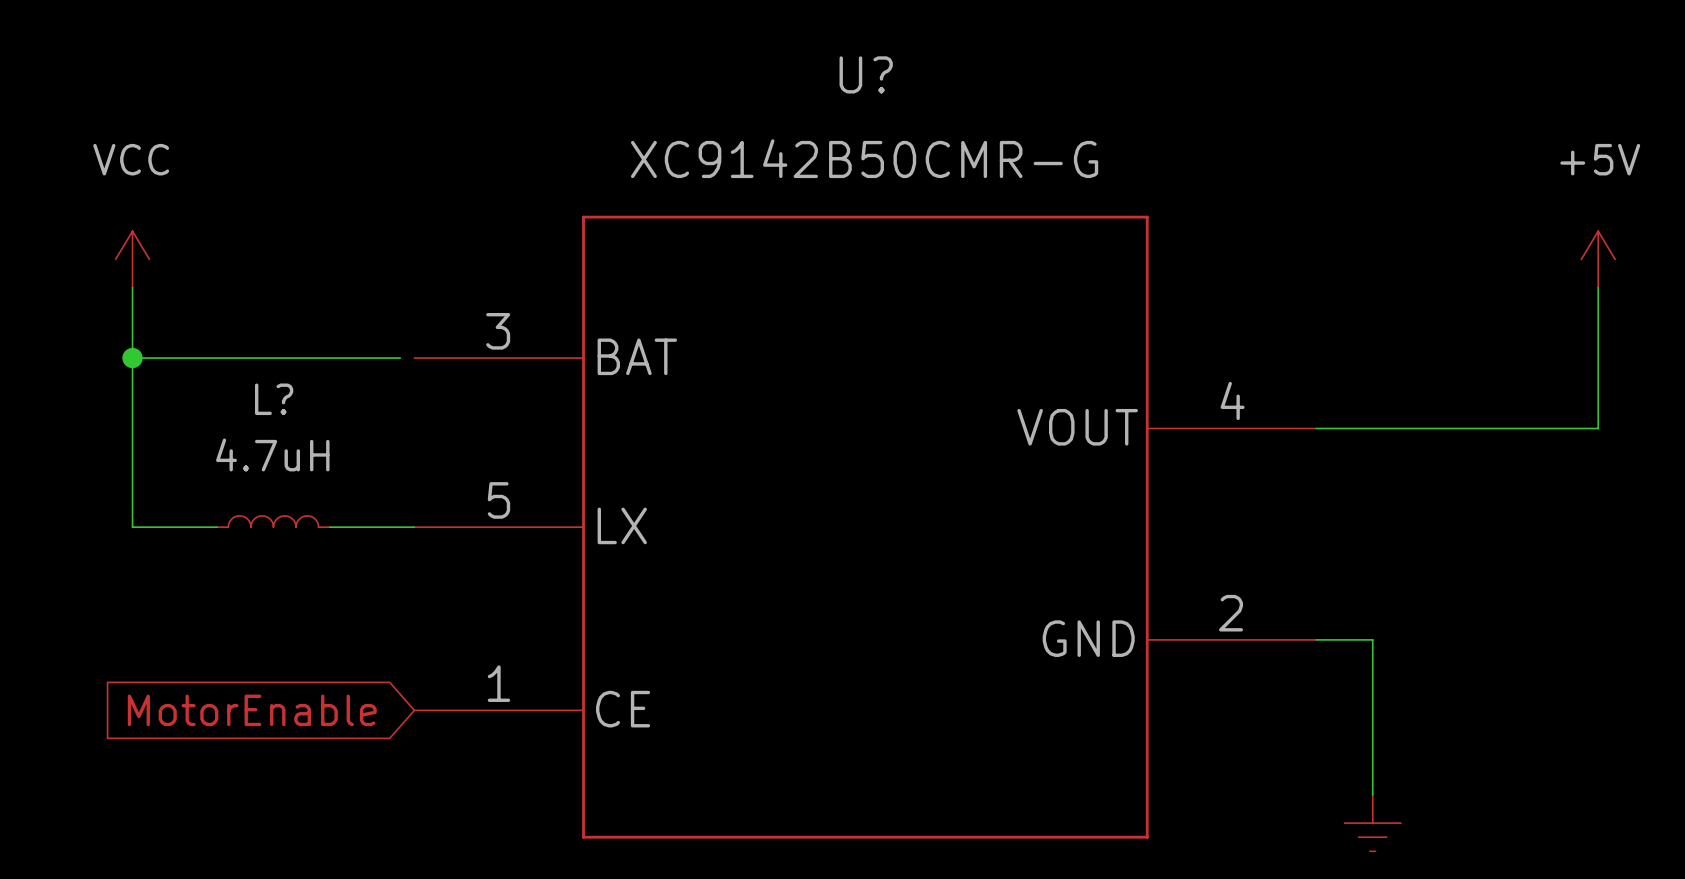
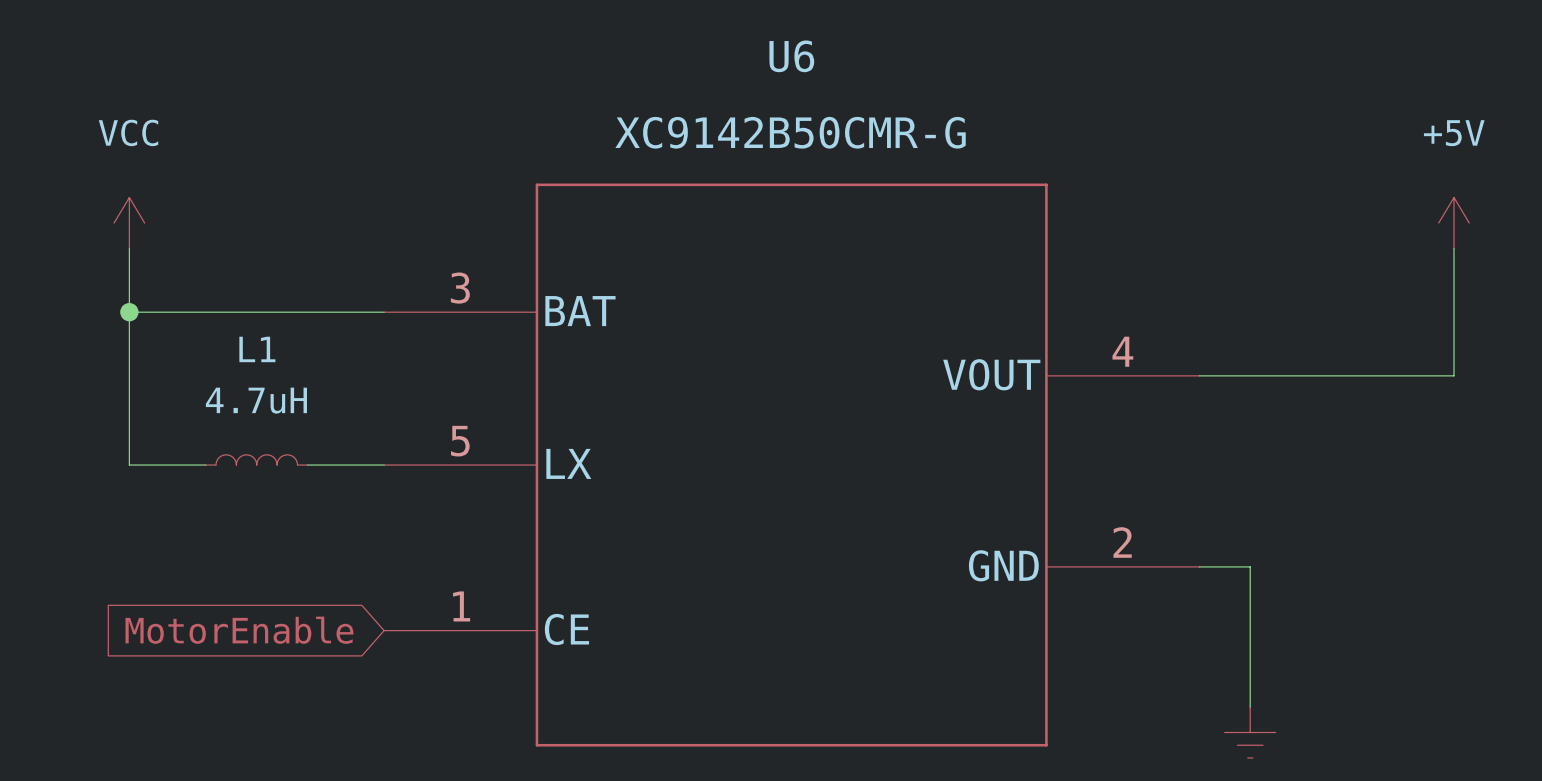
U? name: U? (866, 74) -> U6 (791, 56)
wire: none -> (371, 312) (384, 312)
L? name: L? (274, 399) -> L1 (257, 349)

